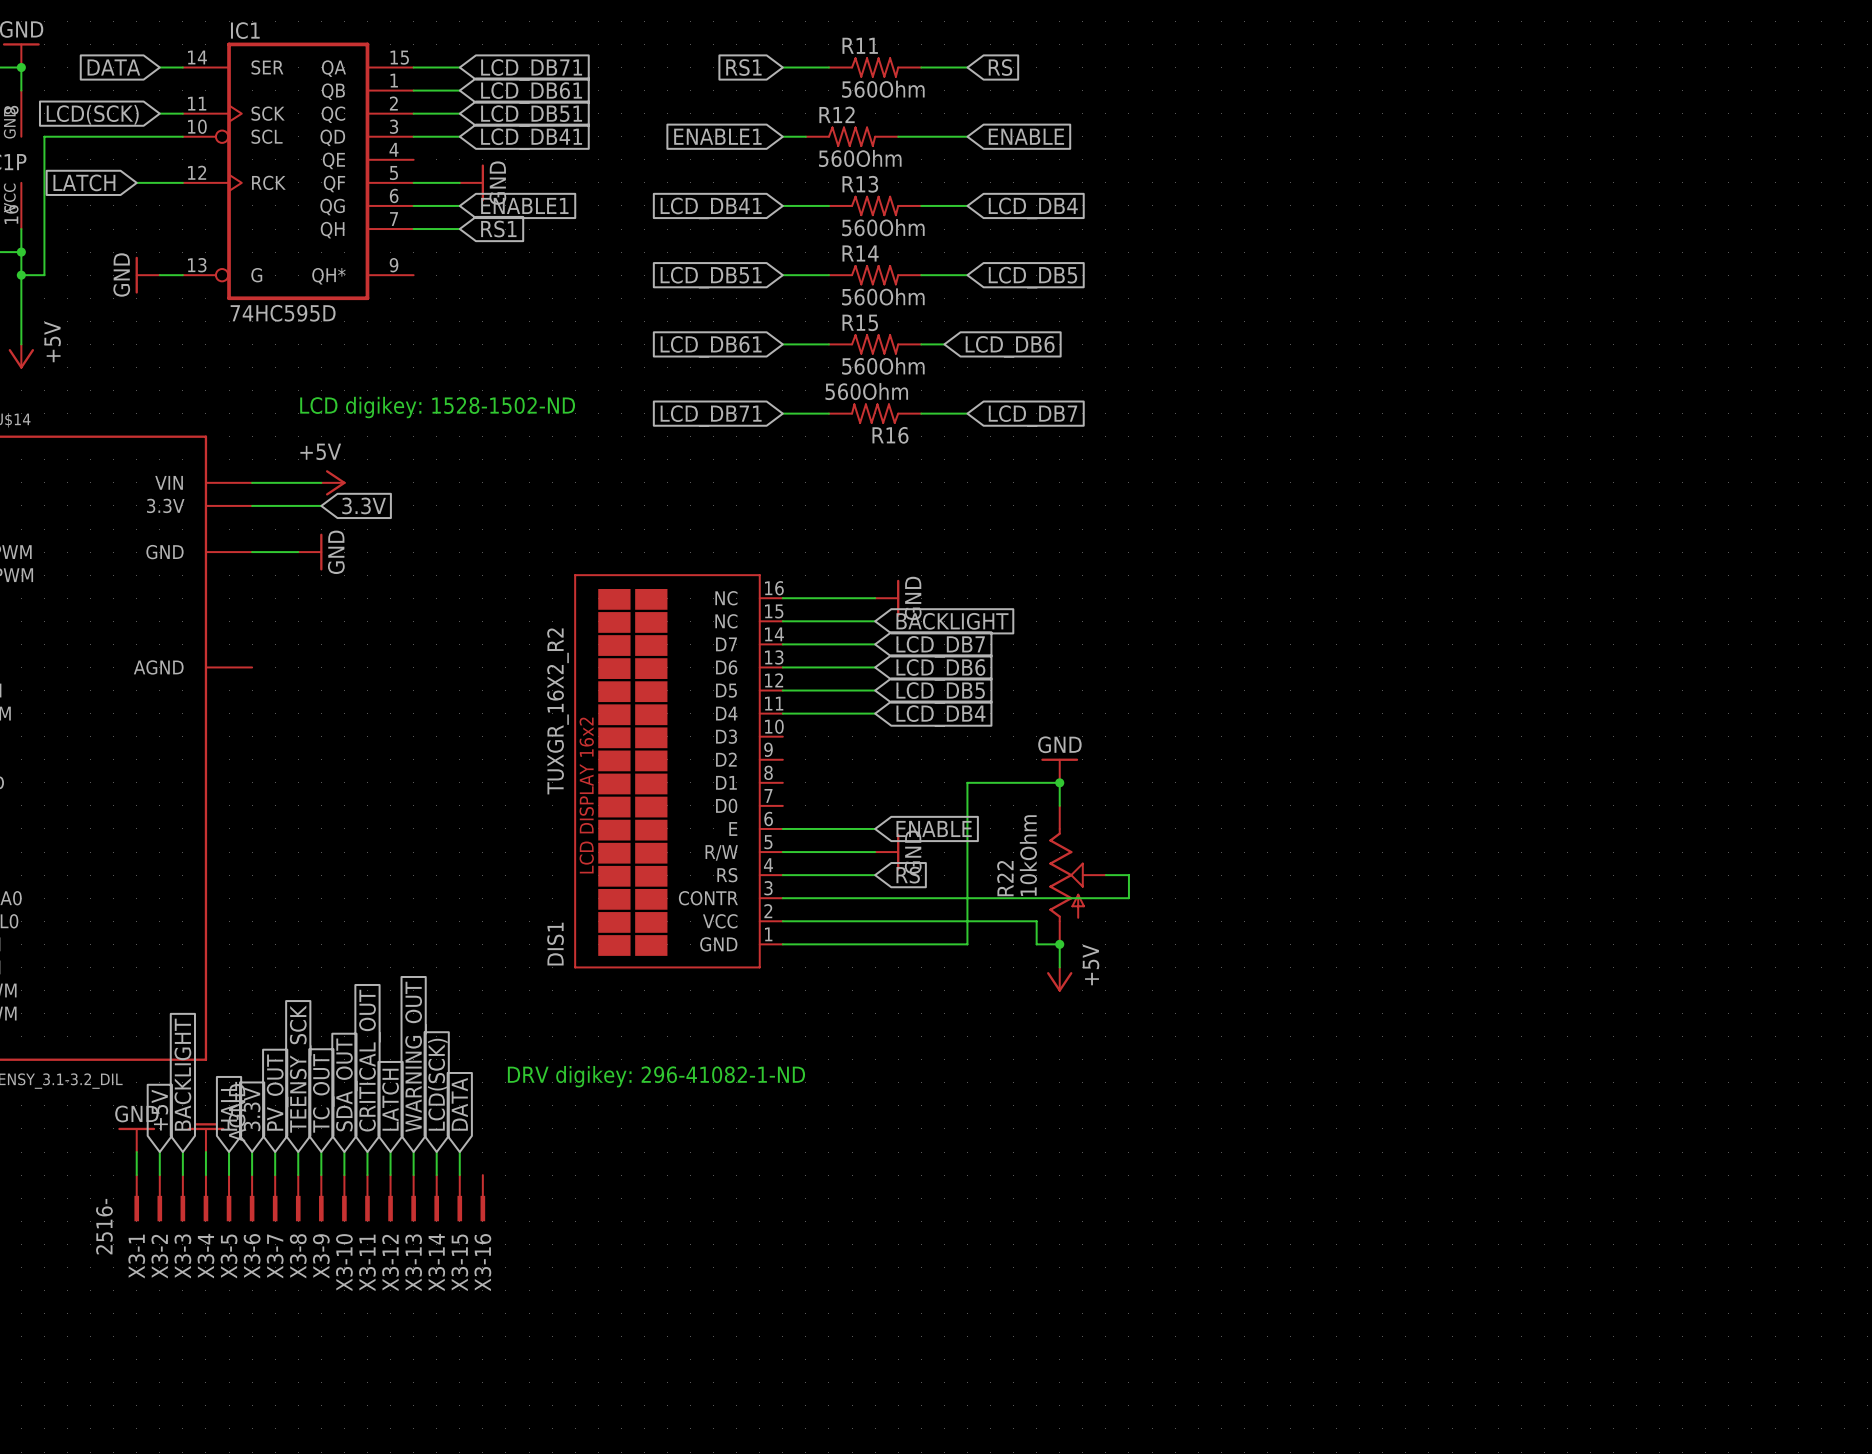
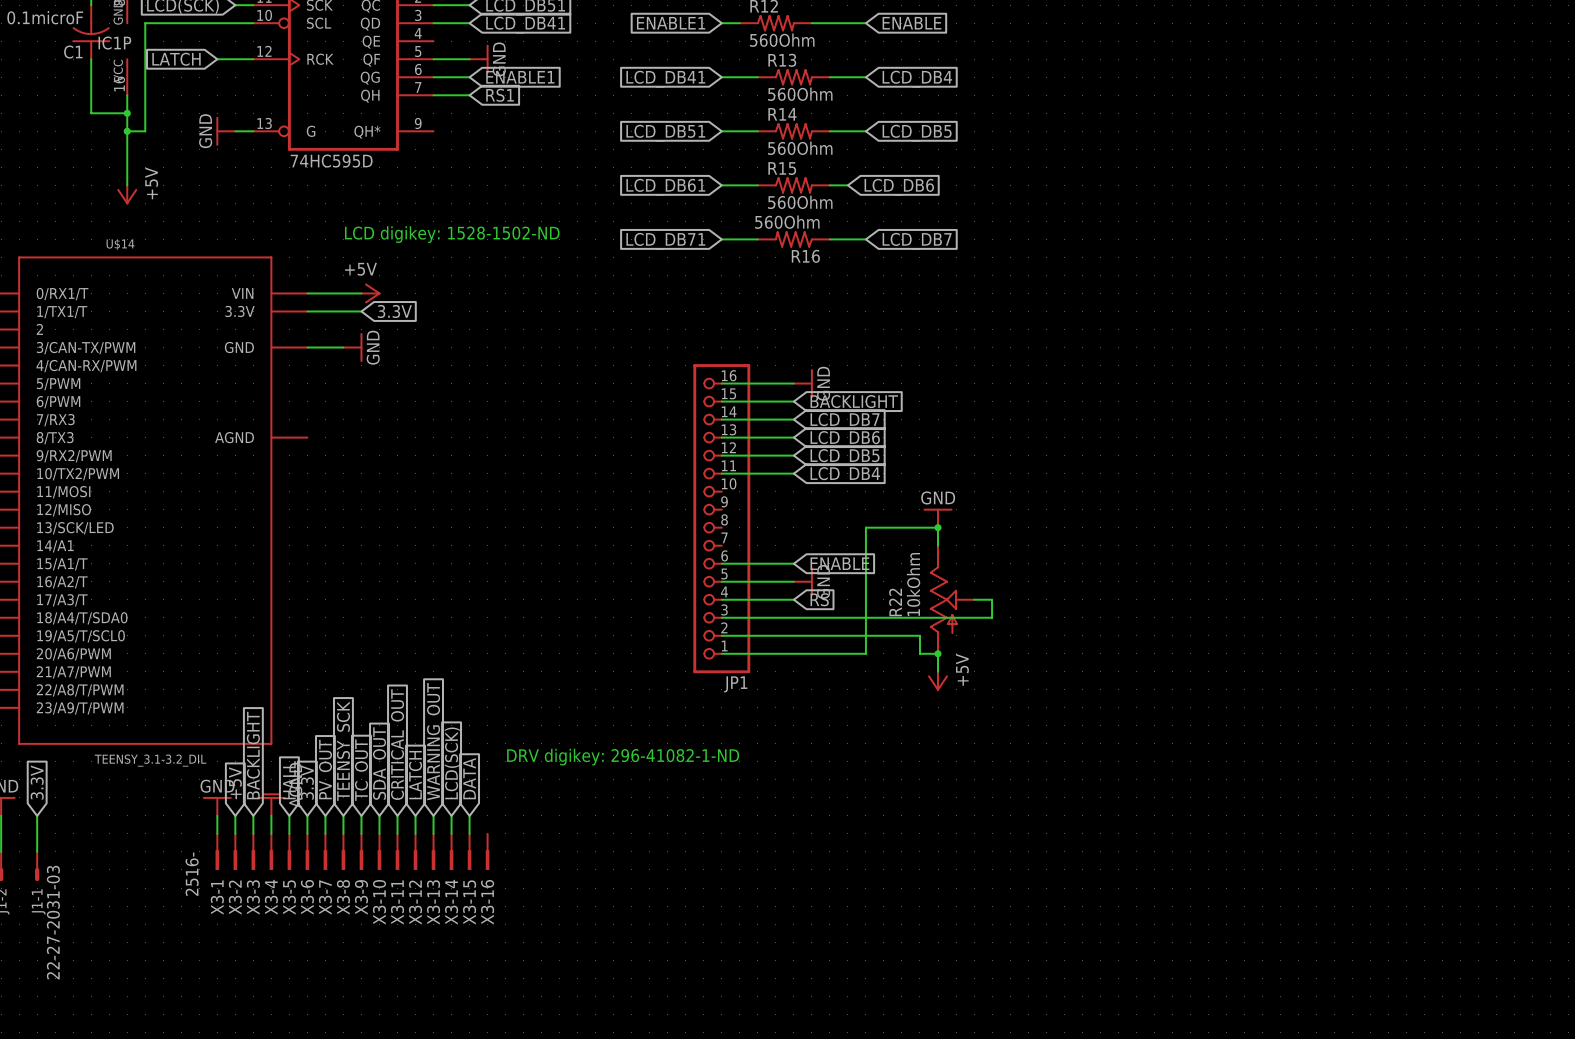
DIS1: TUXGR_16X2_R2 (678, 771) -> none
JP1: none -> (721, 518)

